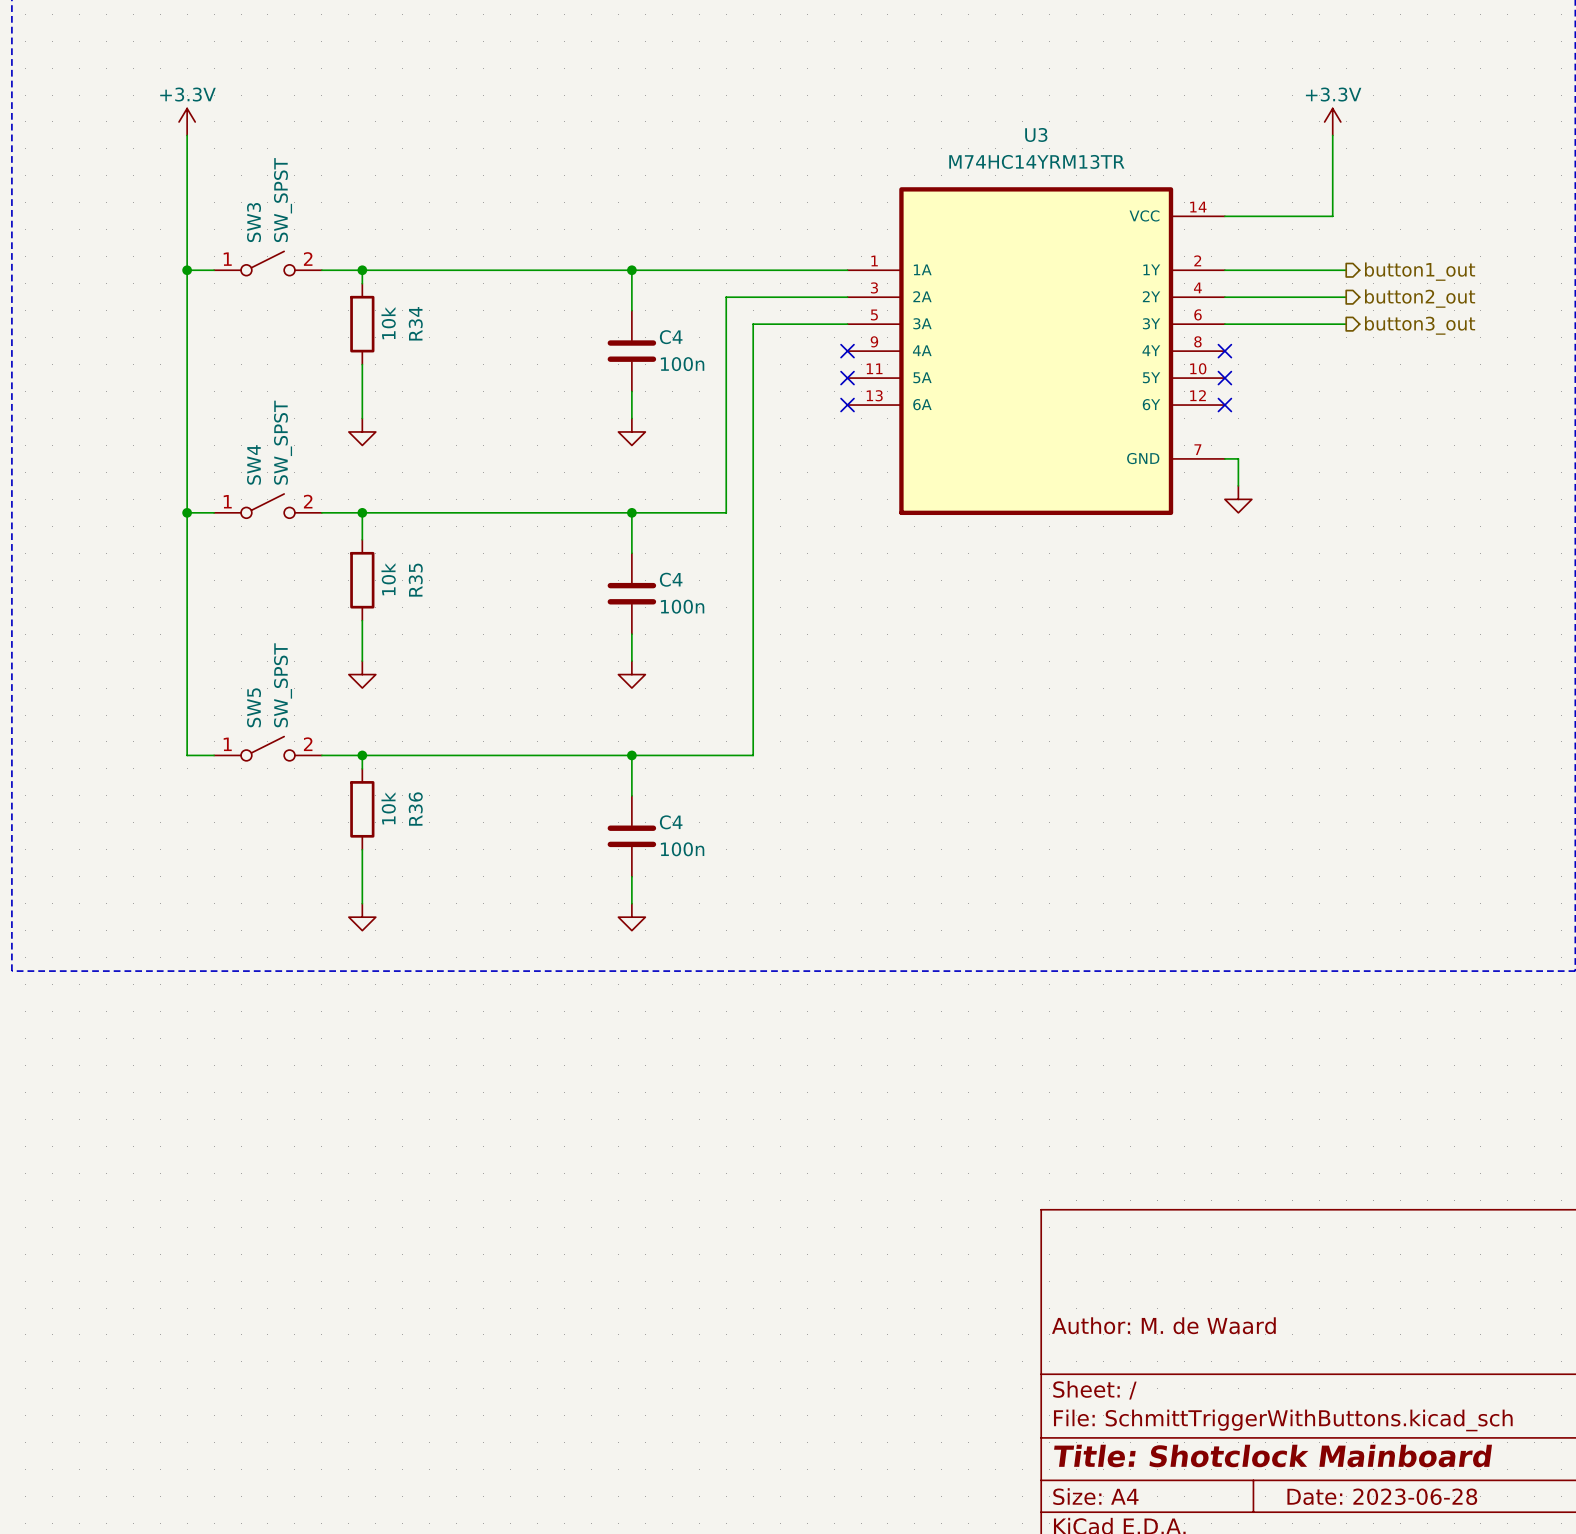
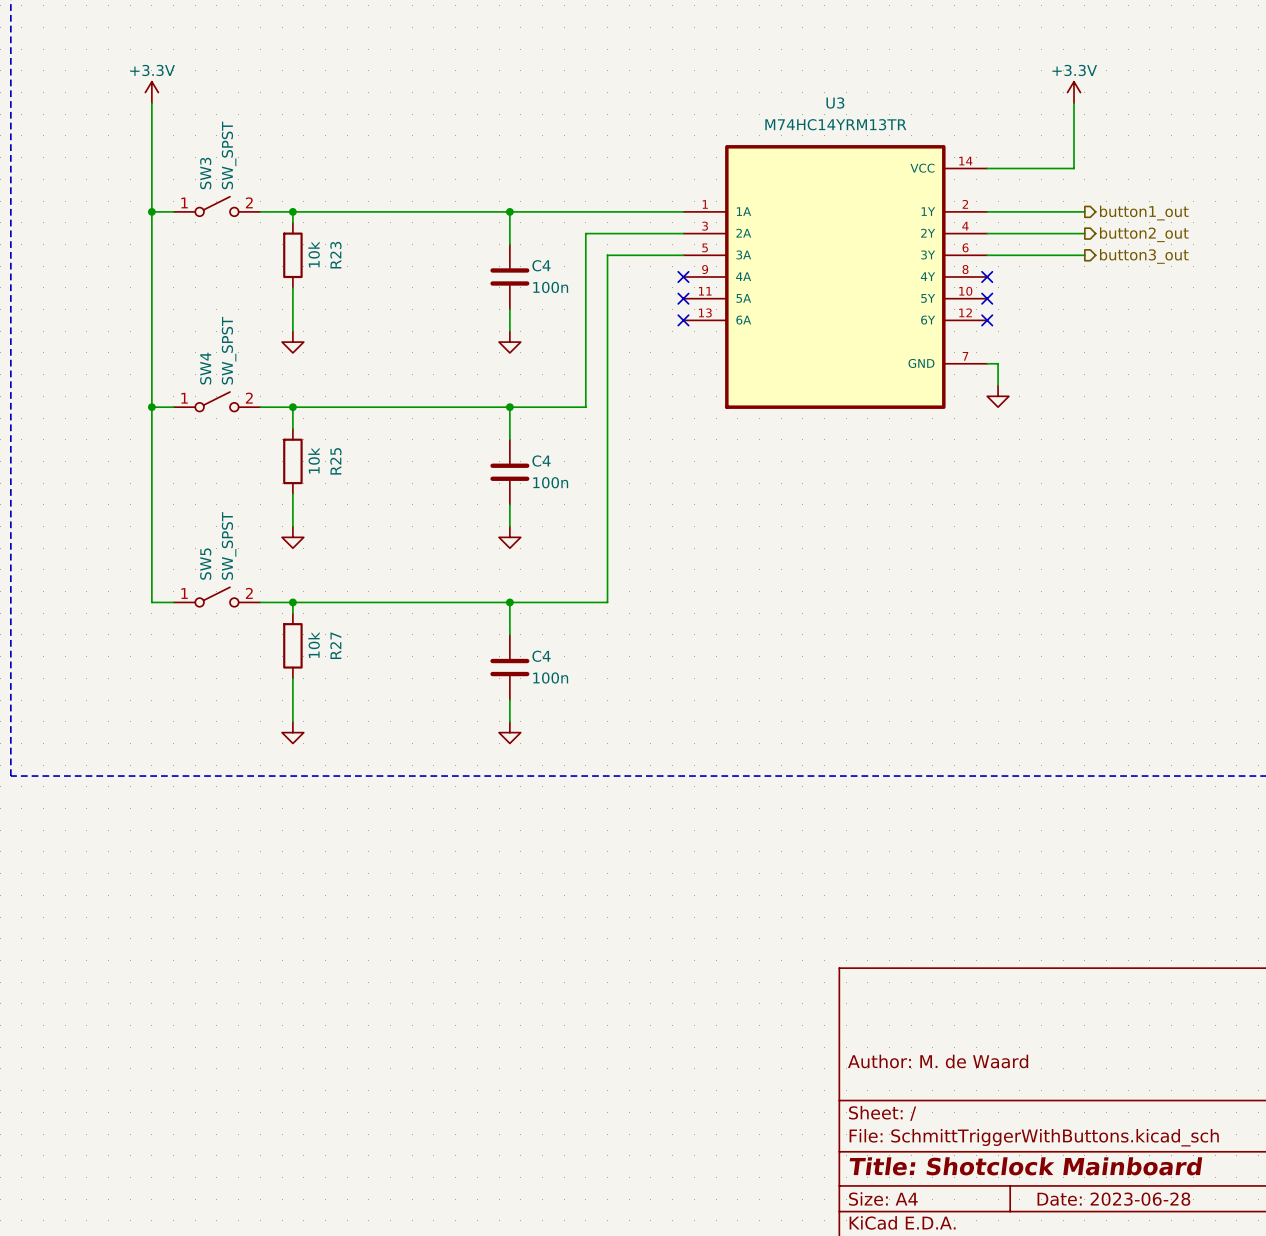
R34 name: R34 (415, 323) -> R23 (335, 255)
R35 name: R35 (415, 580) -> R25 (335, 461)
R36 name: R36 (415, 809) -> R27 (335, 645)

